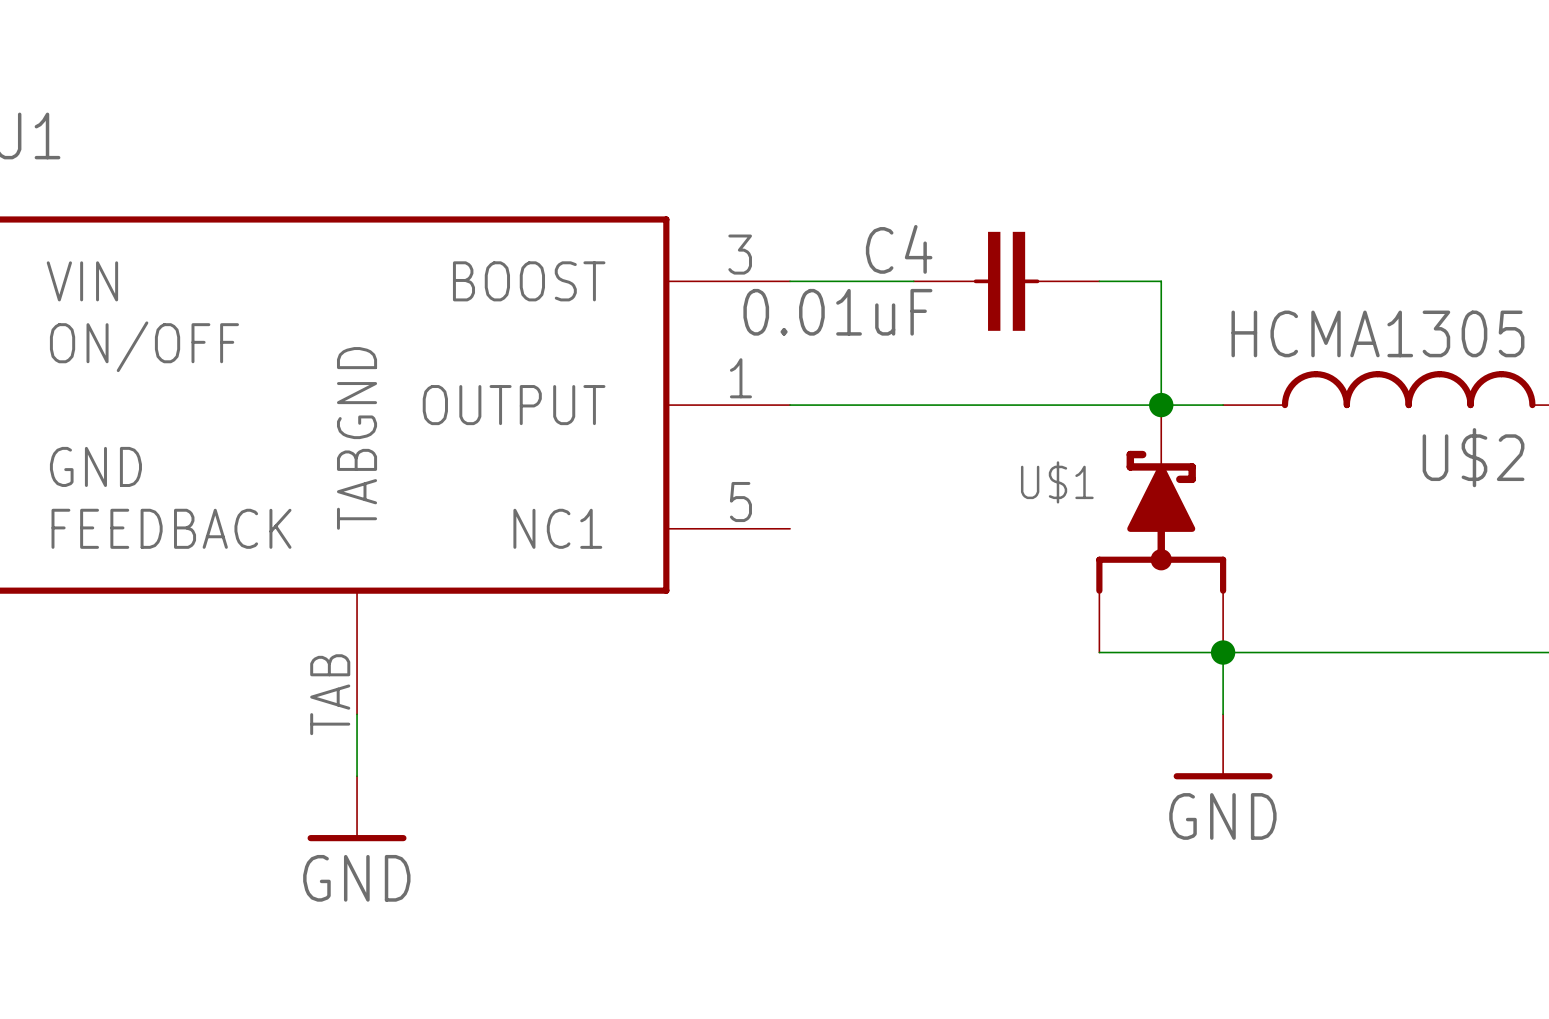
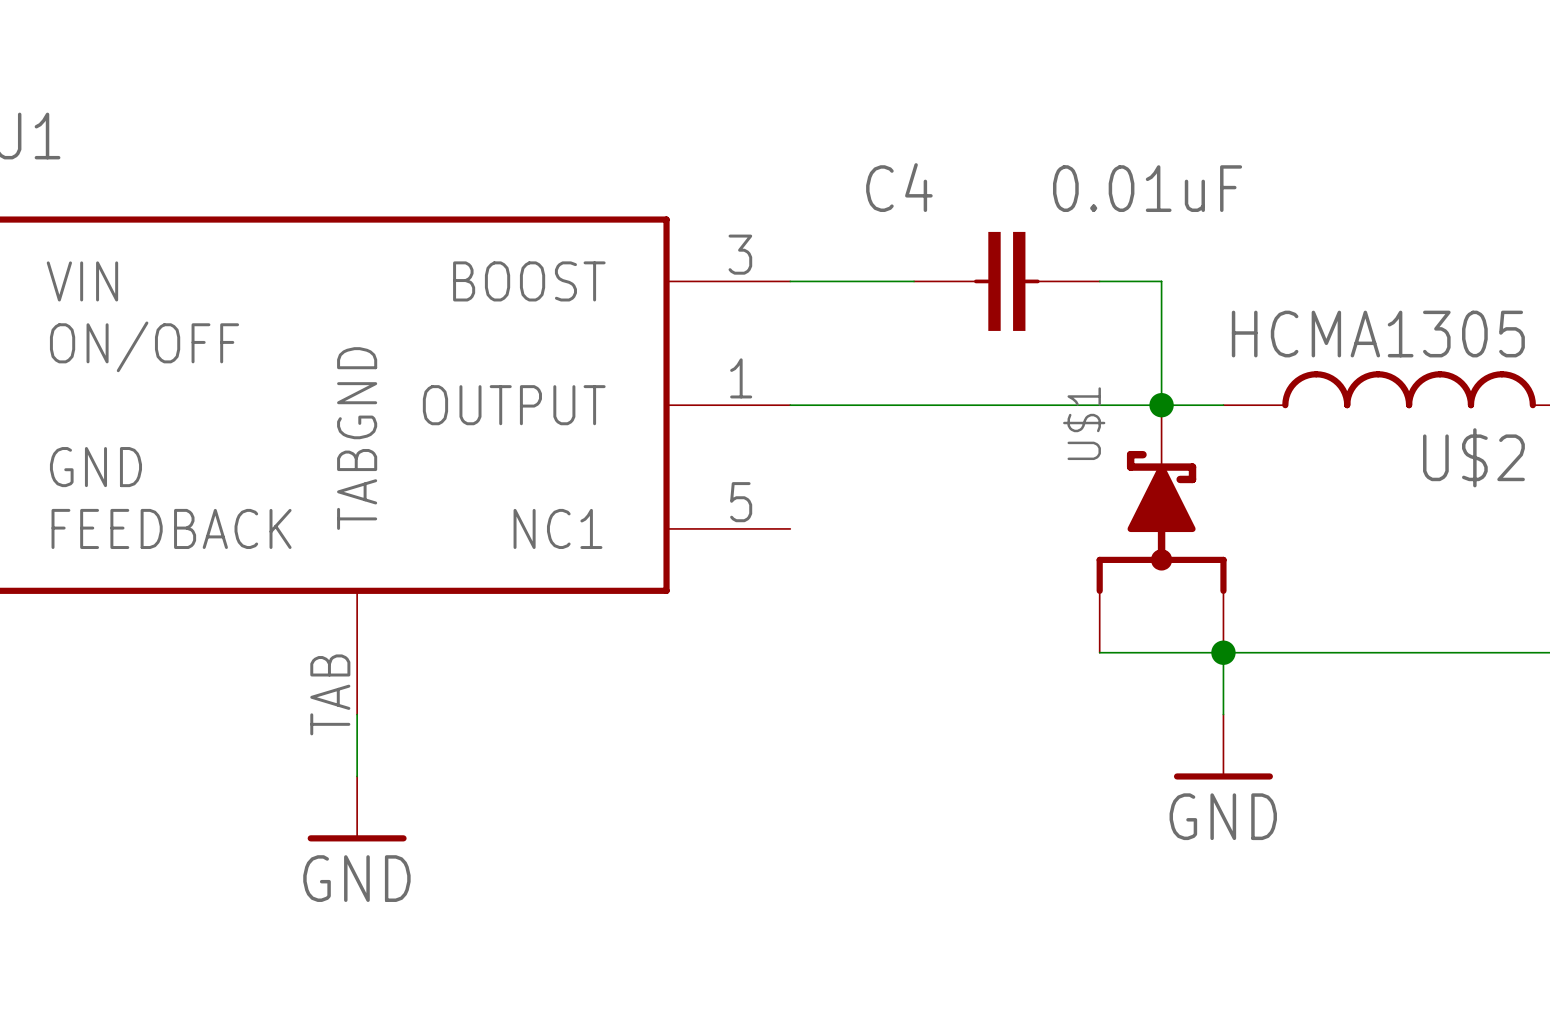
C4 name position: C4 (899, 249) -> C4 (899, 187)
C4 value position: 0.01uF (837, 312) -> 0.01uF (1147, 188)
U$1 name rotation: 0° (1057, 482) -> 90° counterclockwise (1084, 423)

